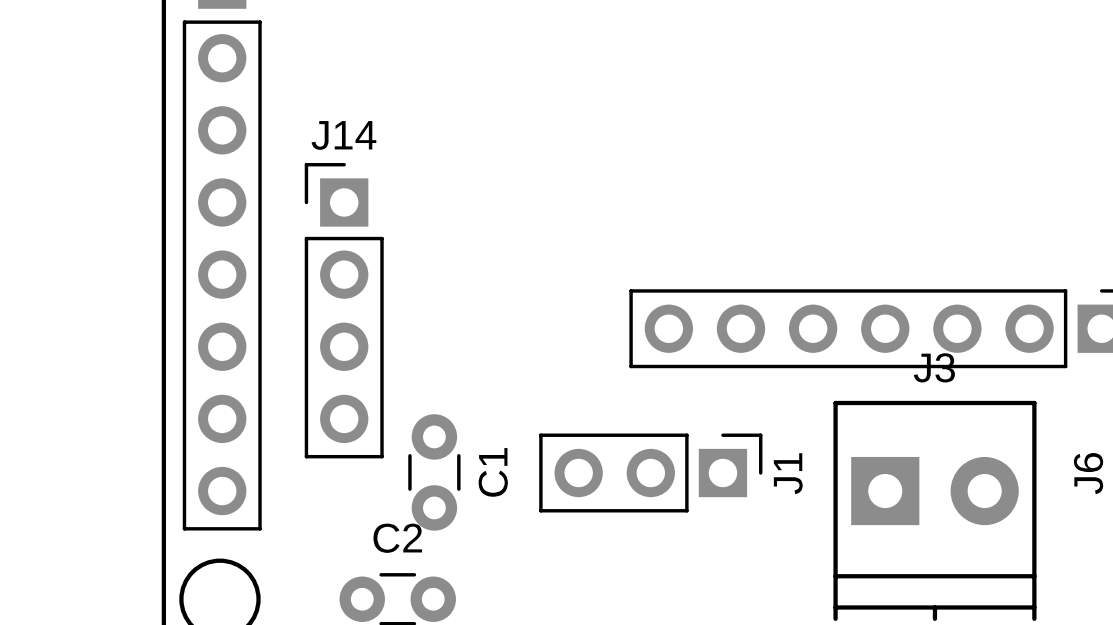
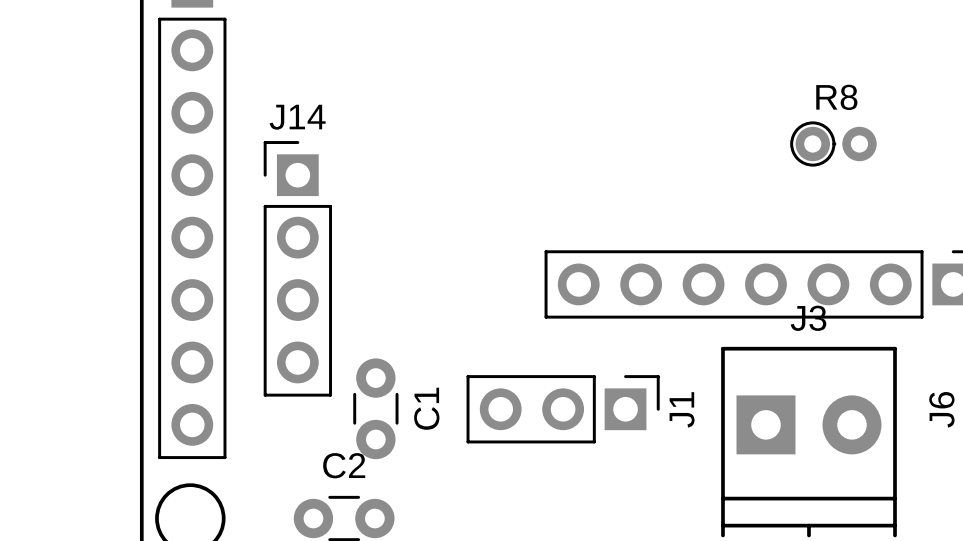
R8: none -> (833, 143)

